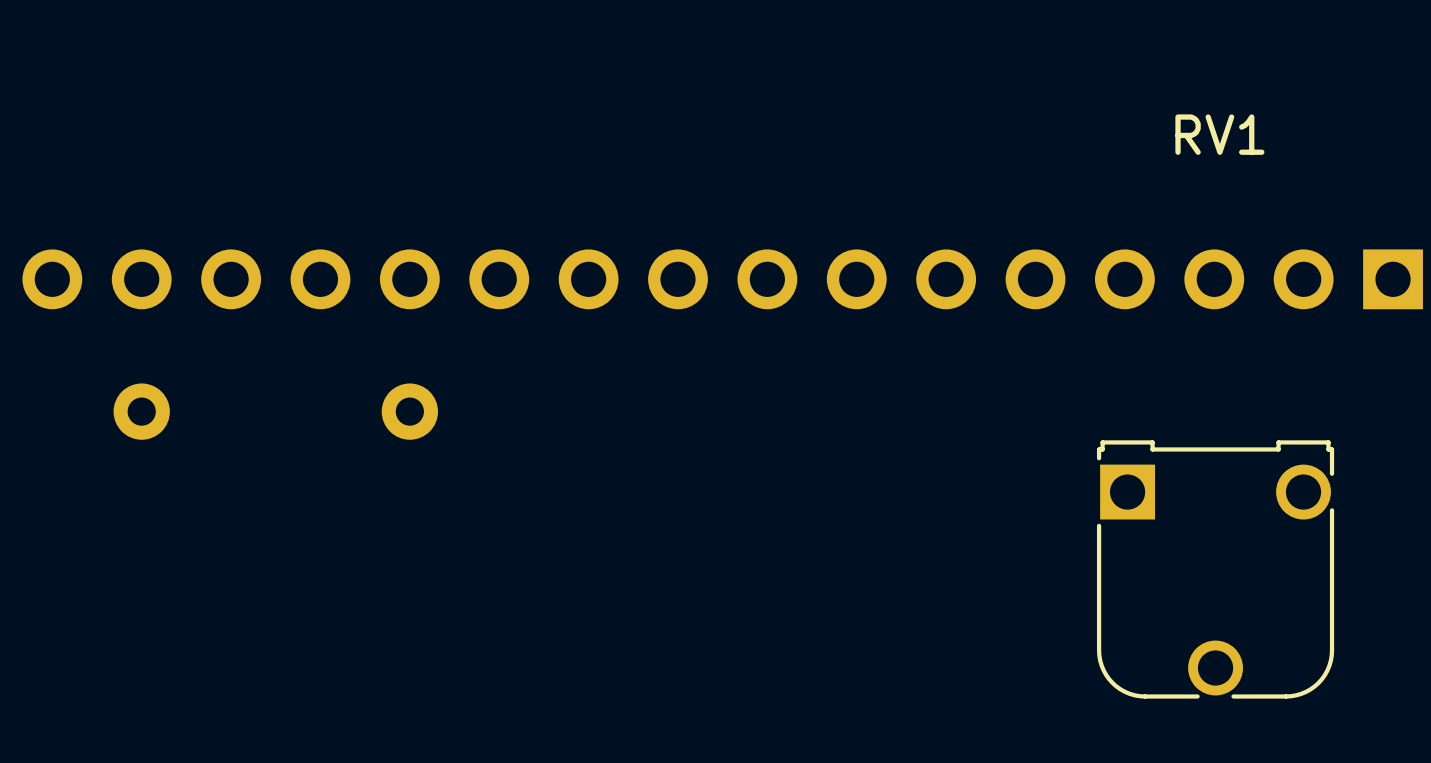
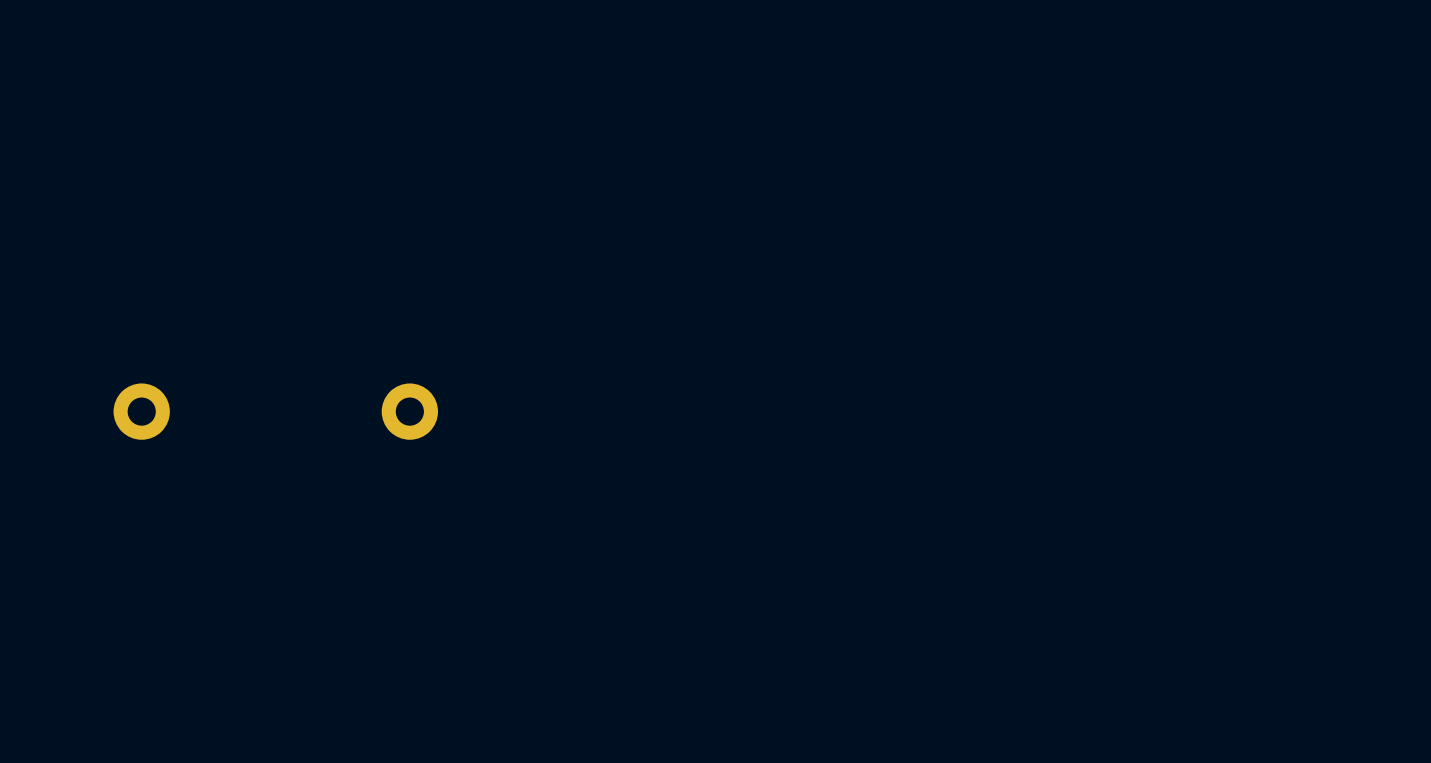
part: (722, 279) -> none
RV1: (1215, 569) -> none

